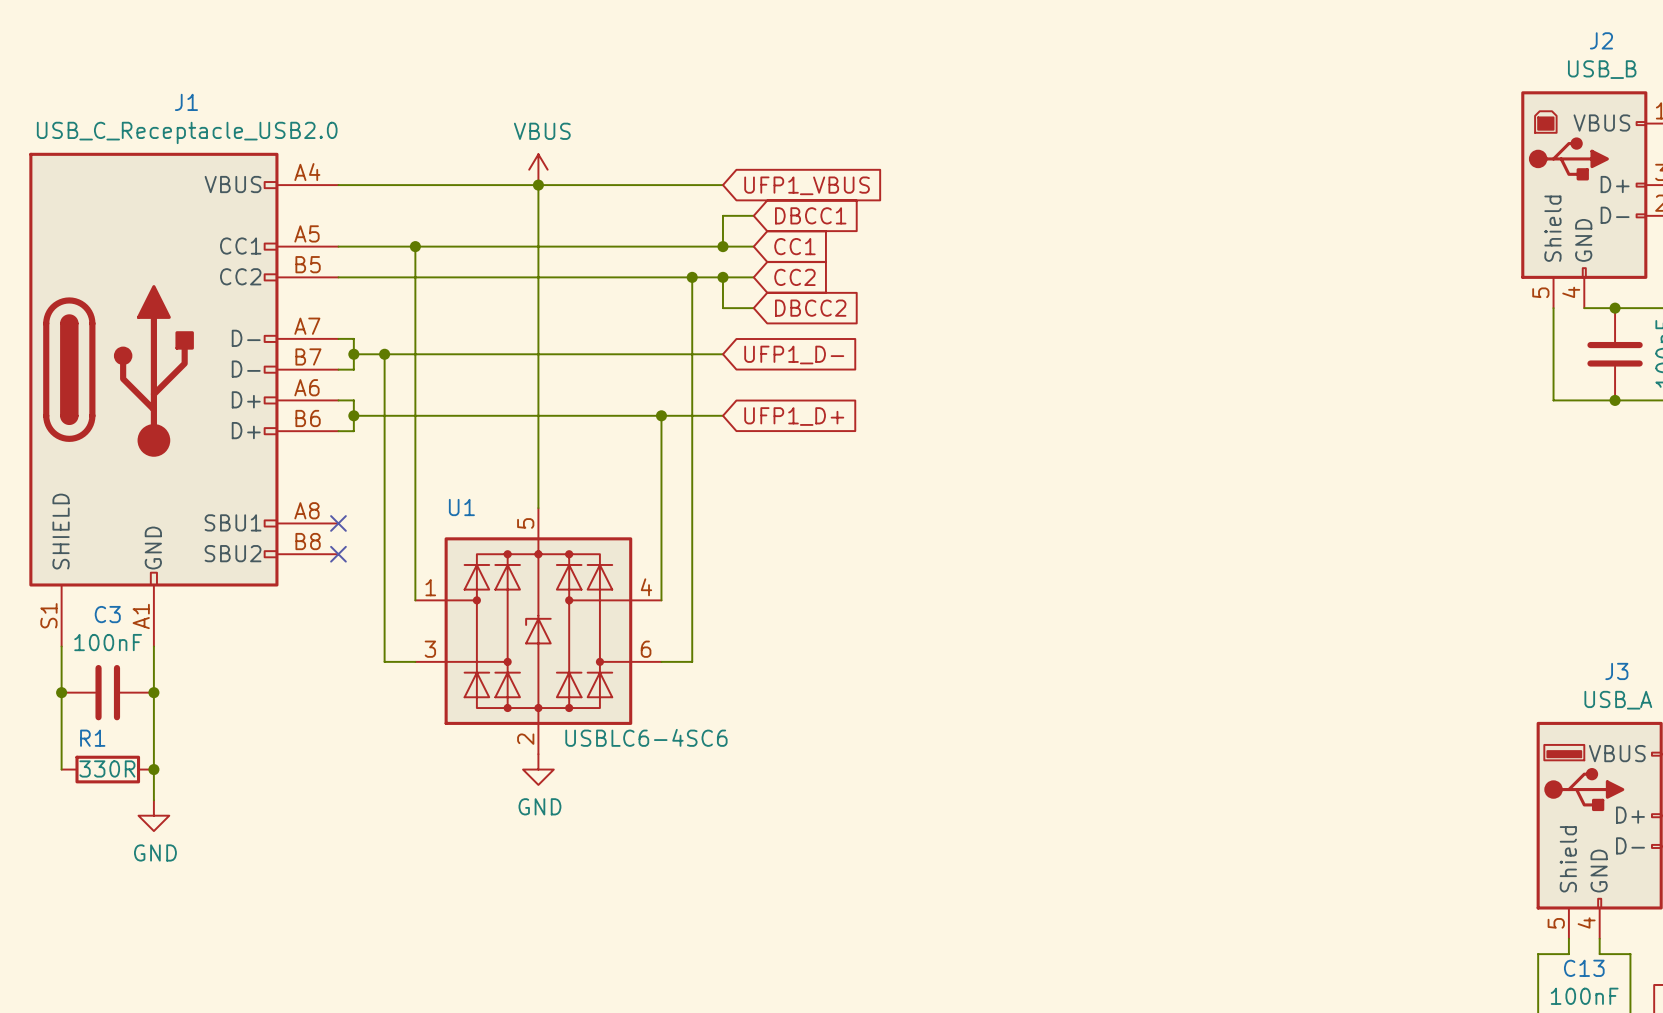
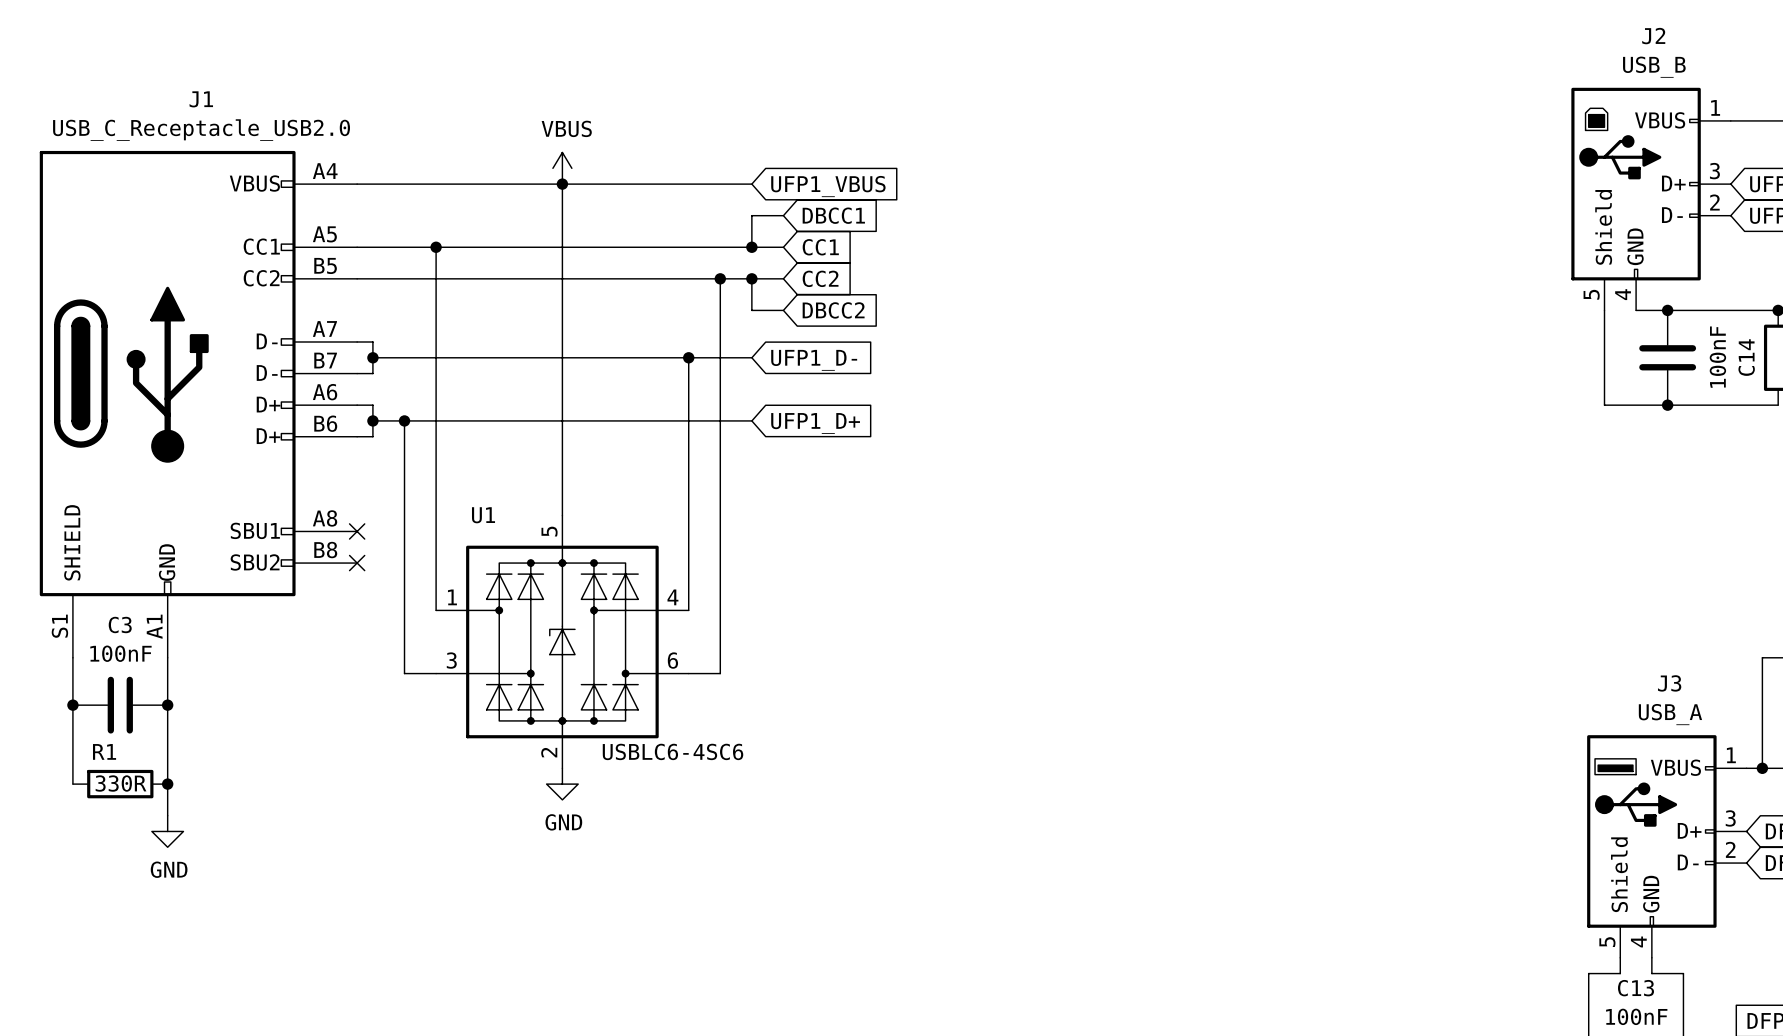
wire: (384, 354) (384, 415) -> (688, 357) (688, 420)
junction position: (384, 354) -> (404, 420)
junction position: (661, 415) -> (688, 357)

